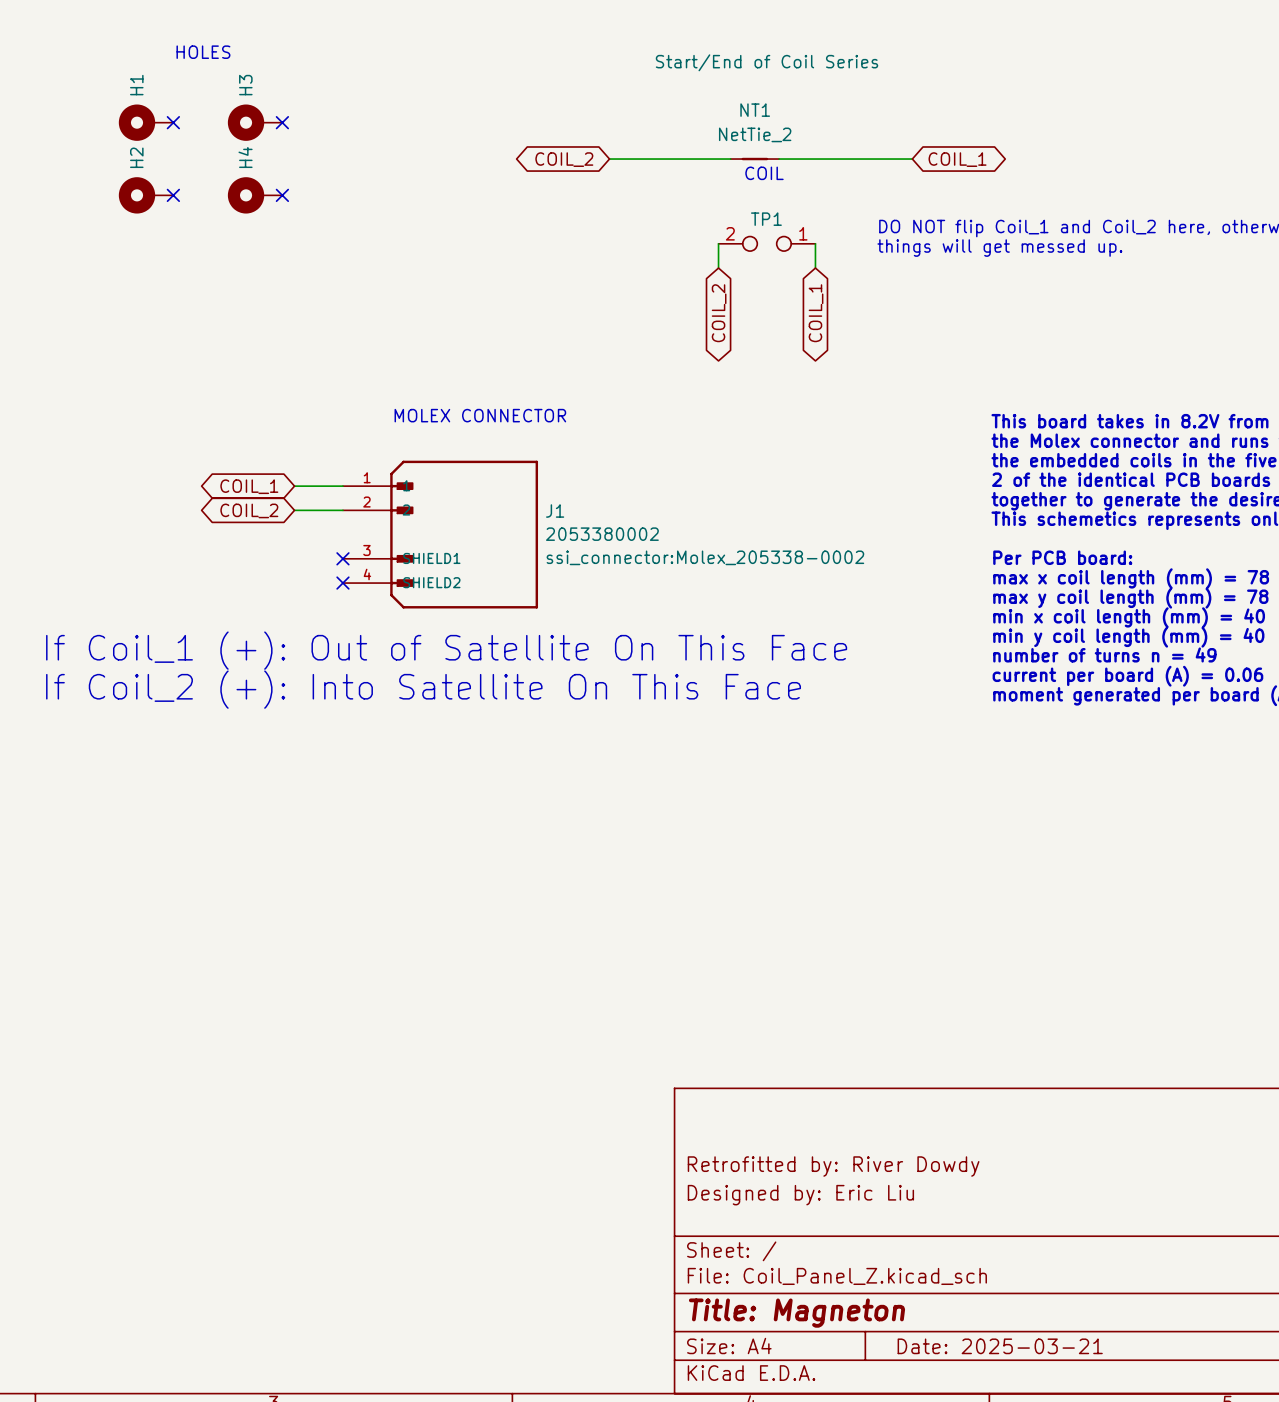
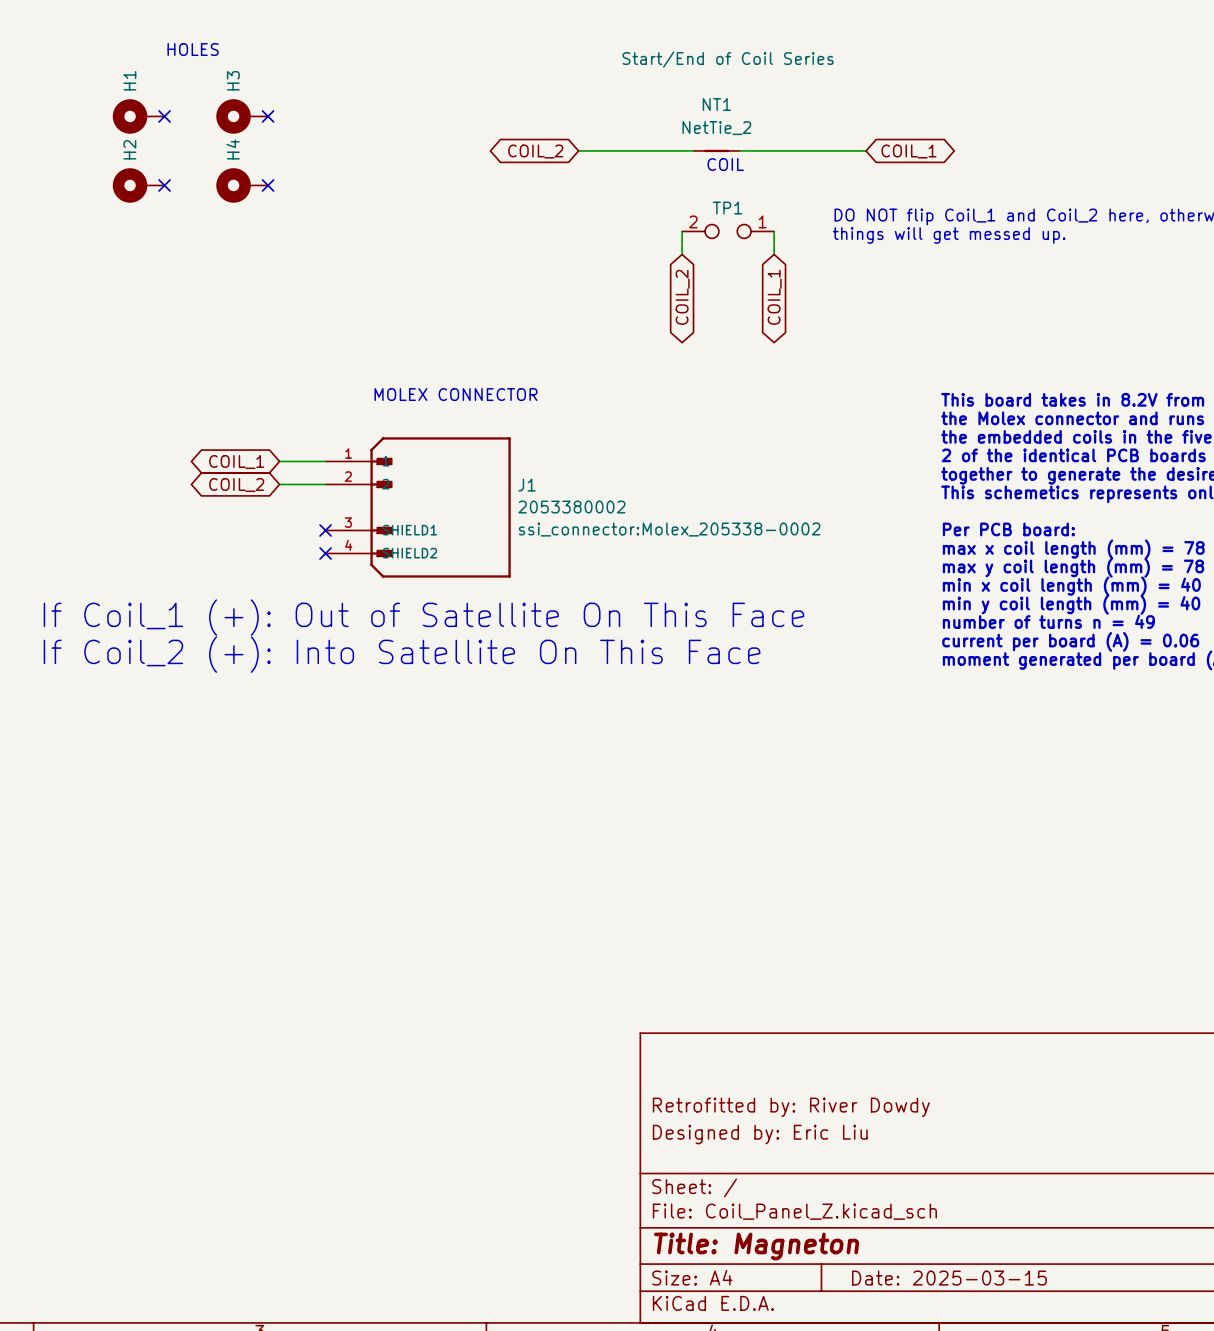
title block: Date: 2025-03-21 (1000, 1346) -> Date: 2025-03-15 (949, 1278)

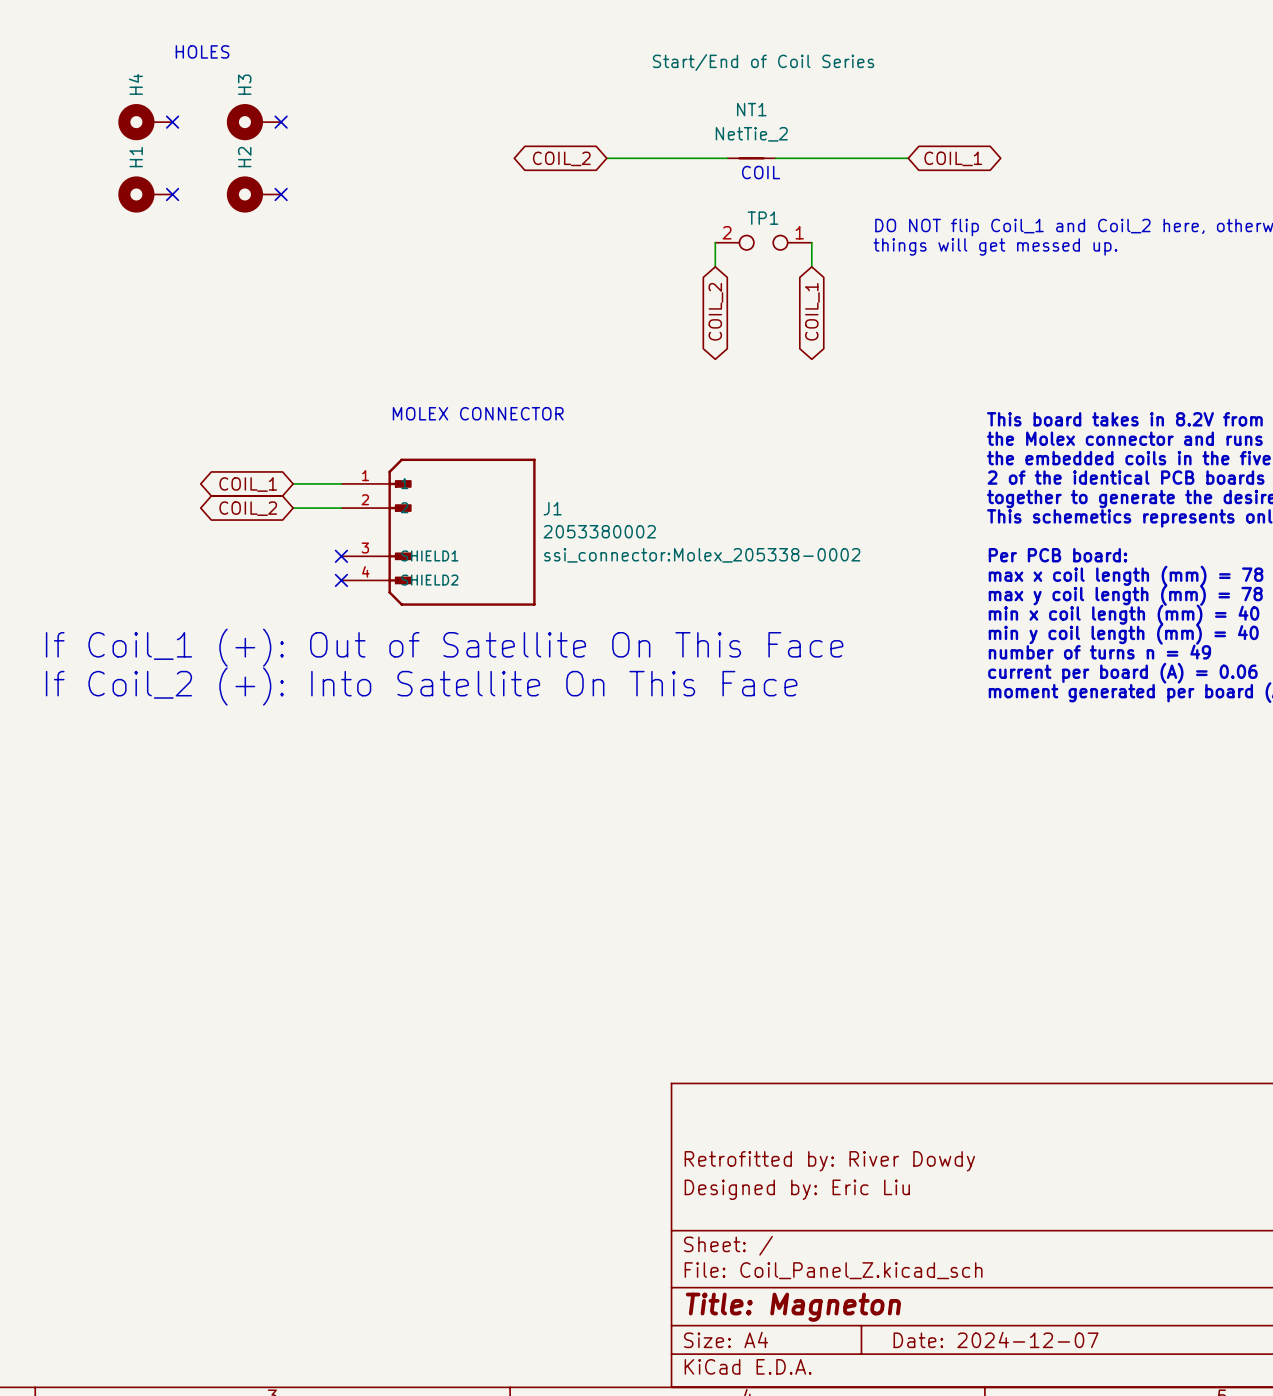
H1 name: H1 (129, 80) -> H4 (135, 84)
H2 name: H2 (129, 149) -> H1 (136, 157)
H4 name: H4 (233, 149) -> H2 (244, 157)
title block: Date: 2025-03-15 (949, 1278) -> Date: 2024-12-07 (996, 1339)

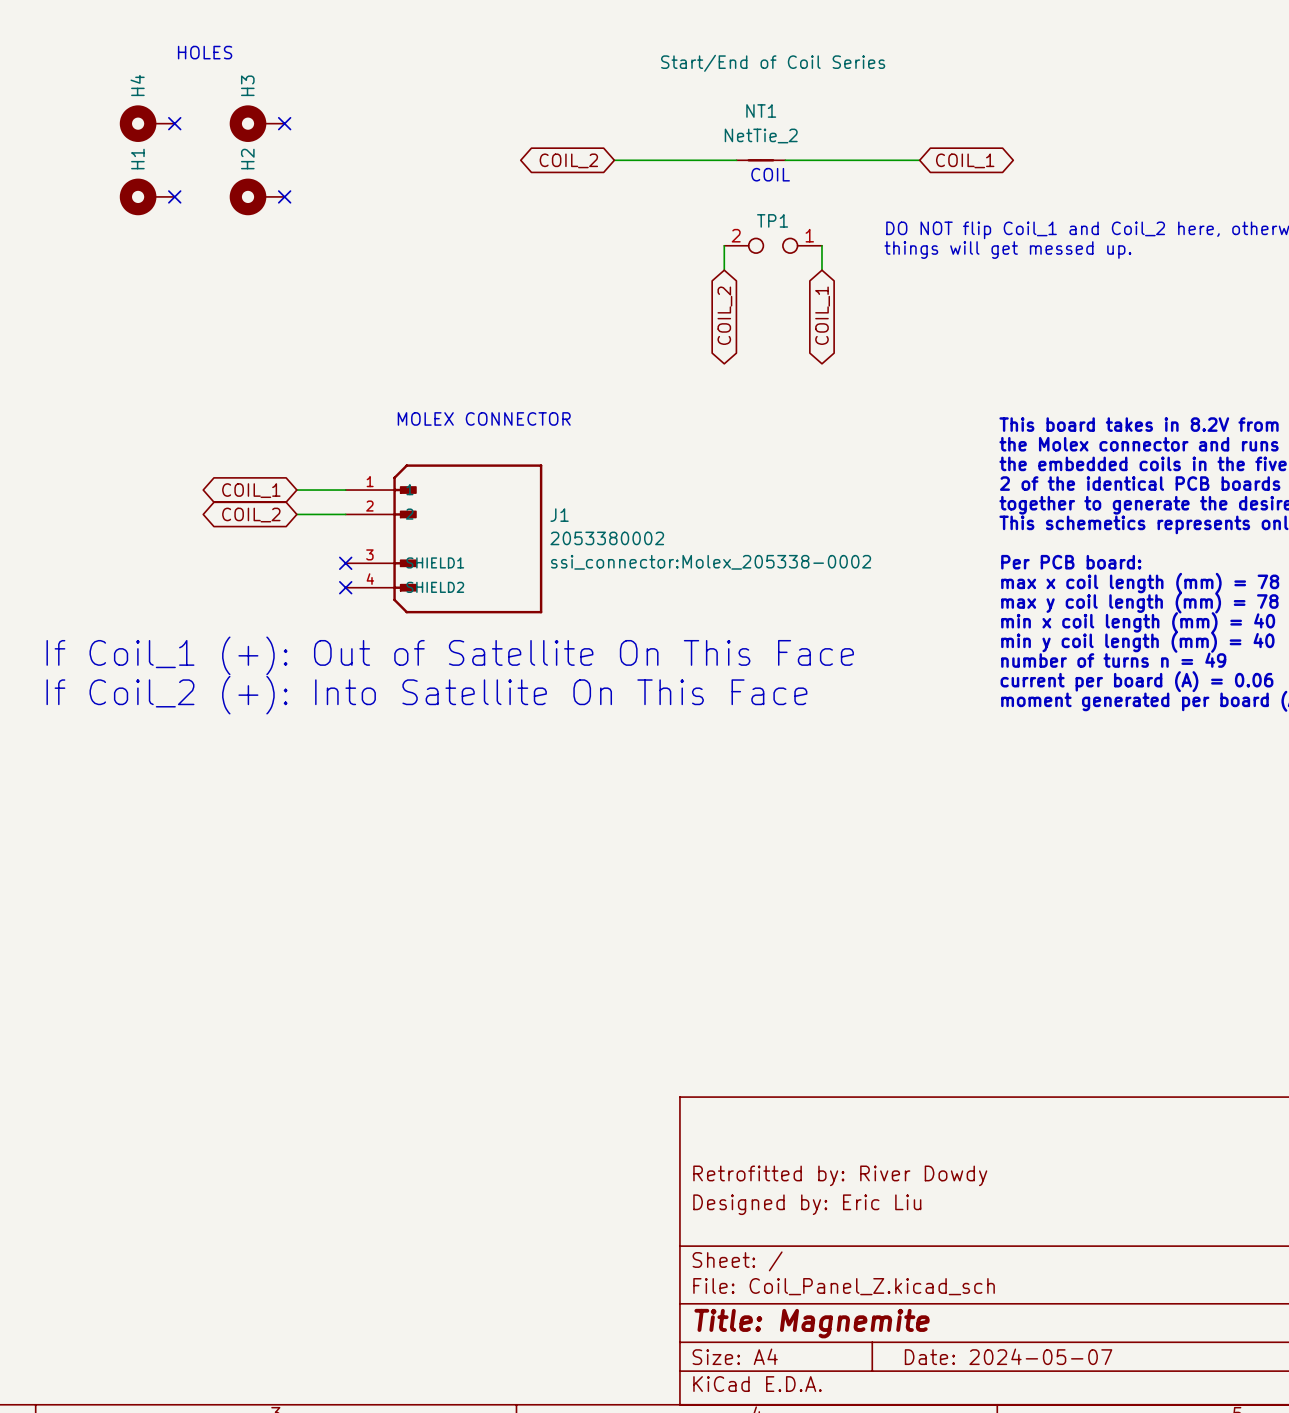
title block: Title: Magneton (793, 1307) -> Title: Magnemite (812, 1323)
title block: Date: 2024-12-07 (996, 1339) -> Date: 2024-05-07 (1008, 1356)

